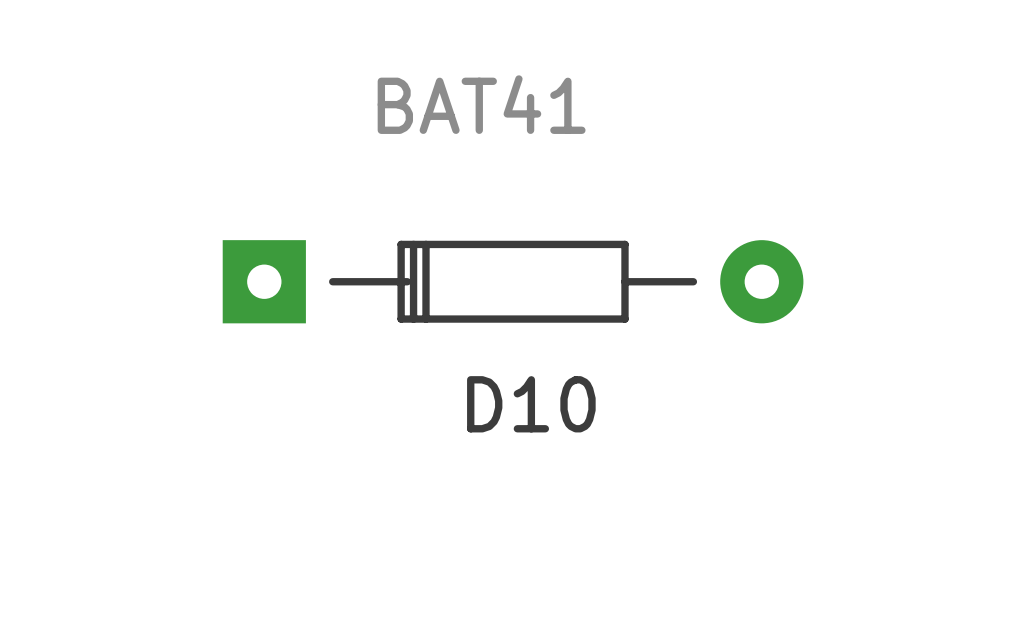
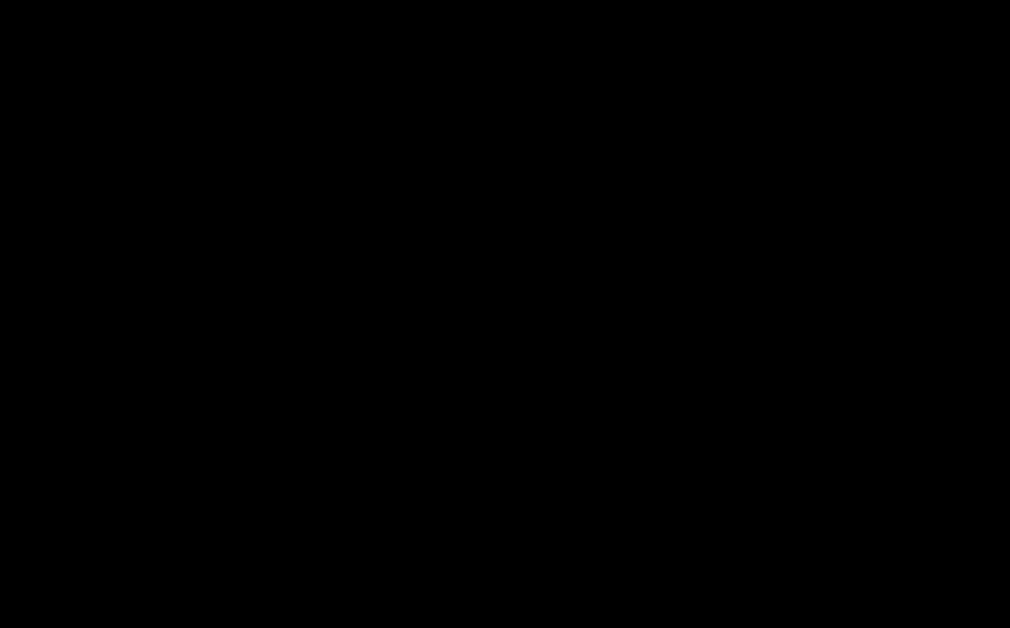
D10: BAT41 (513, 281) -> none

